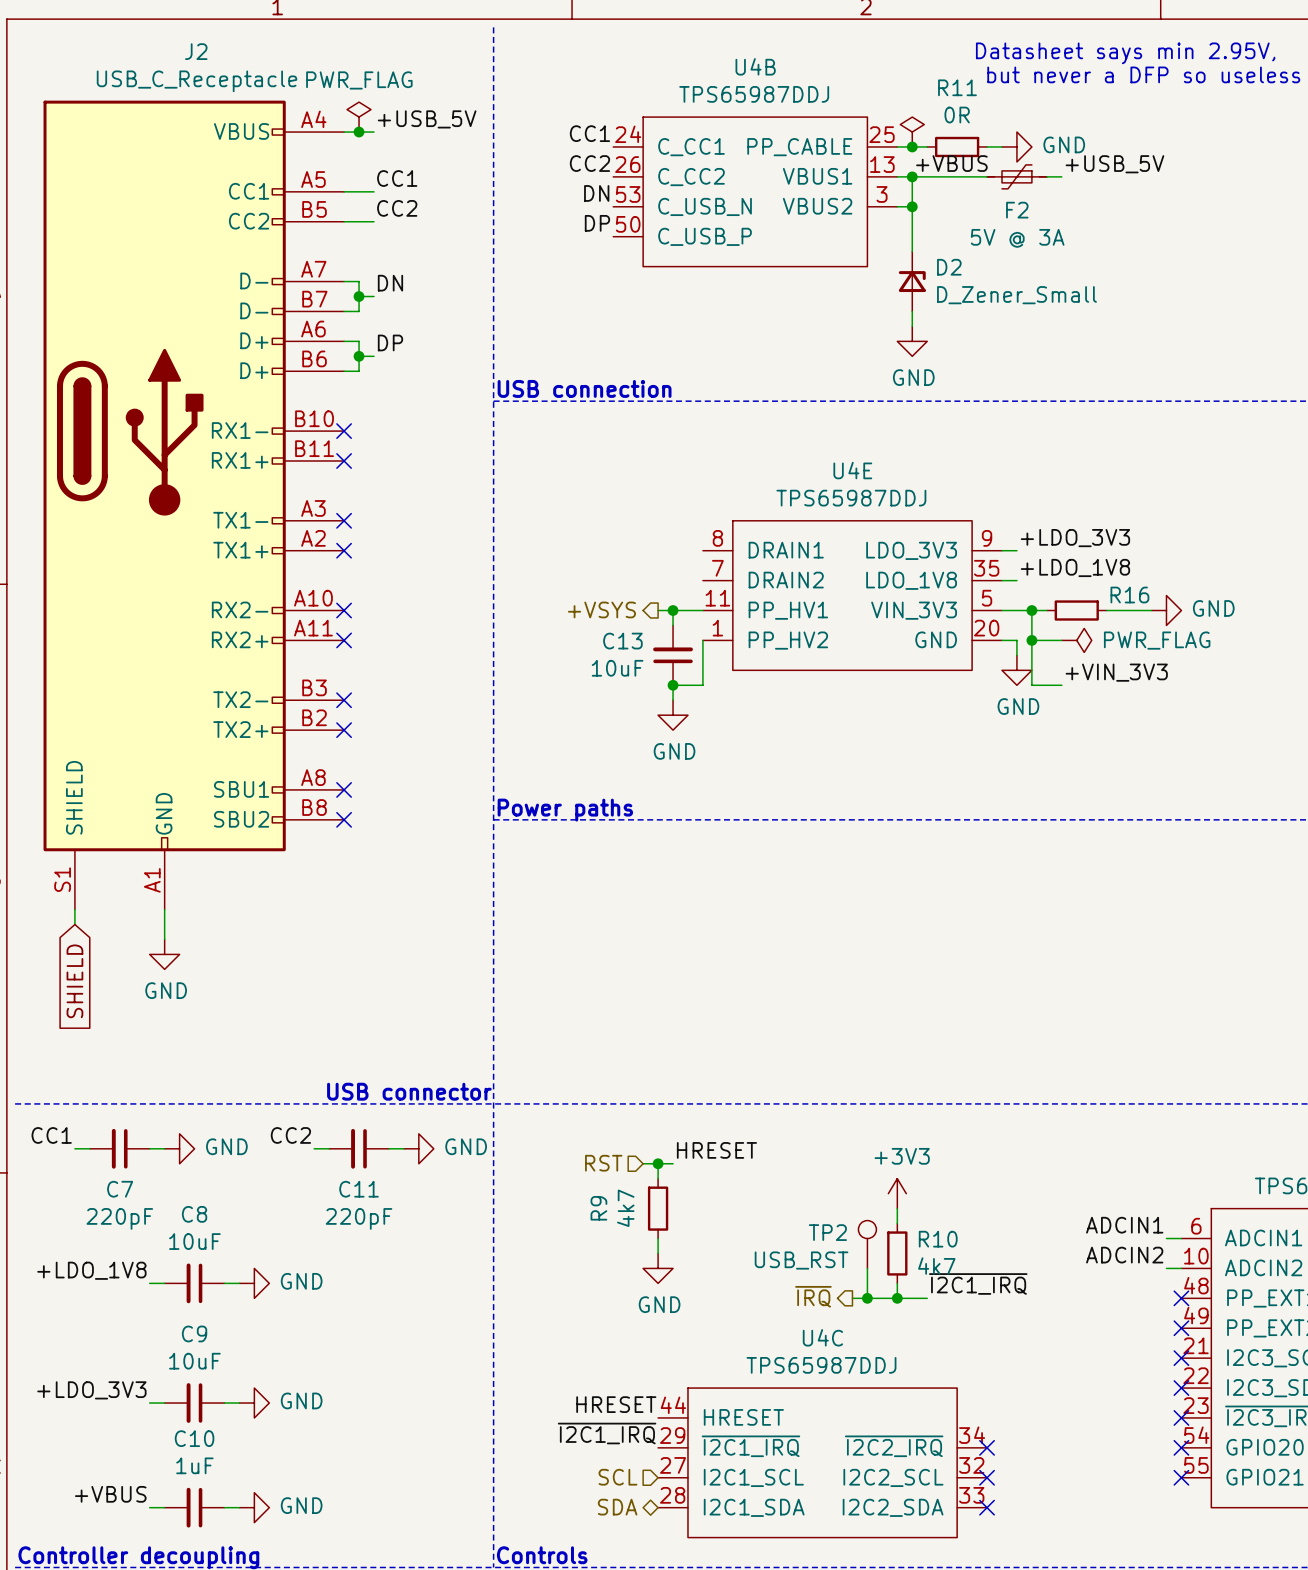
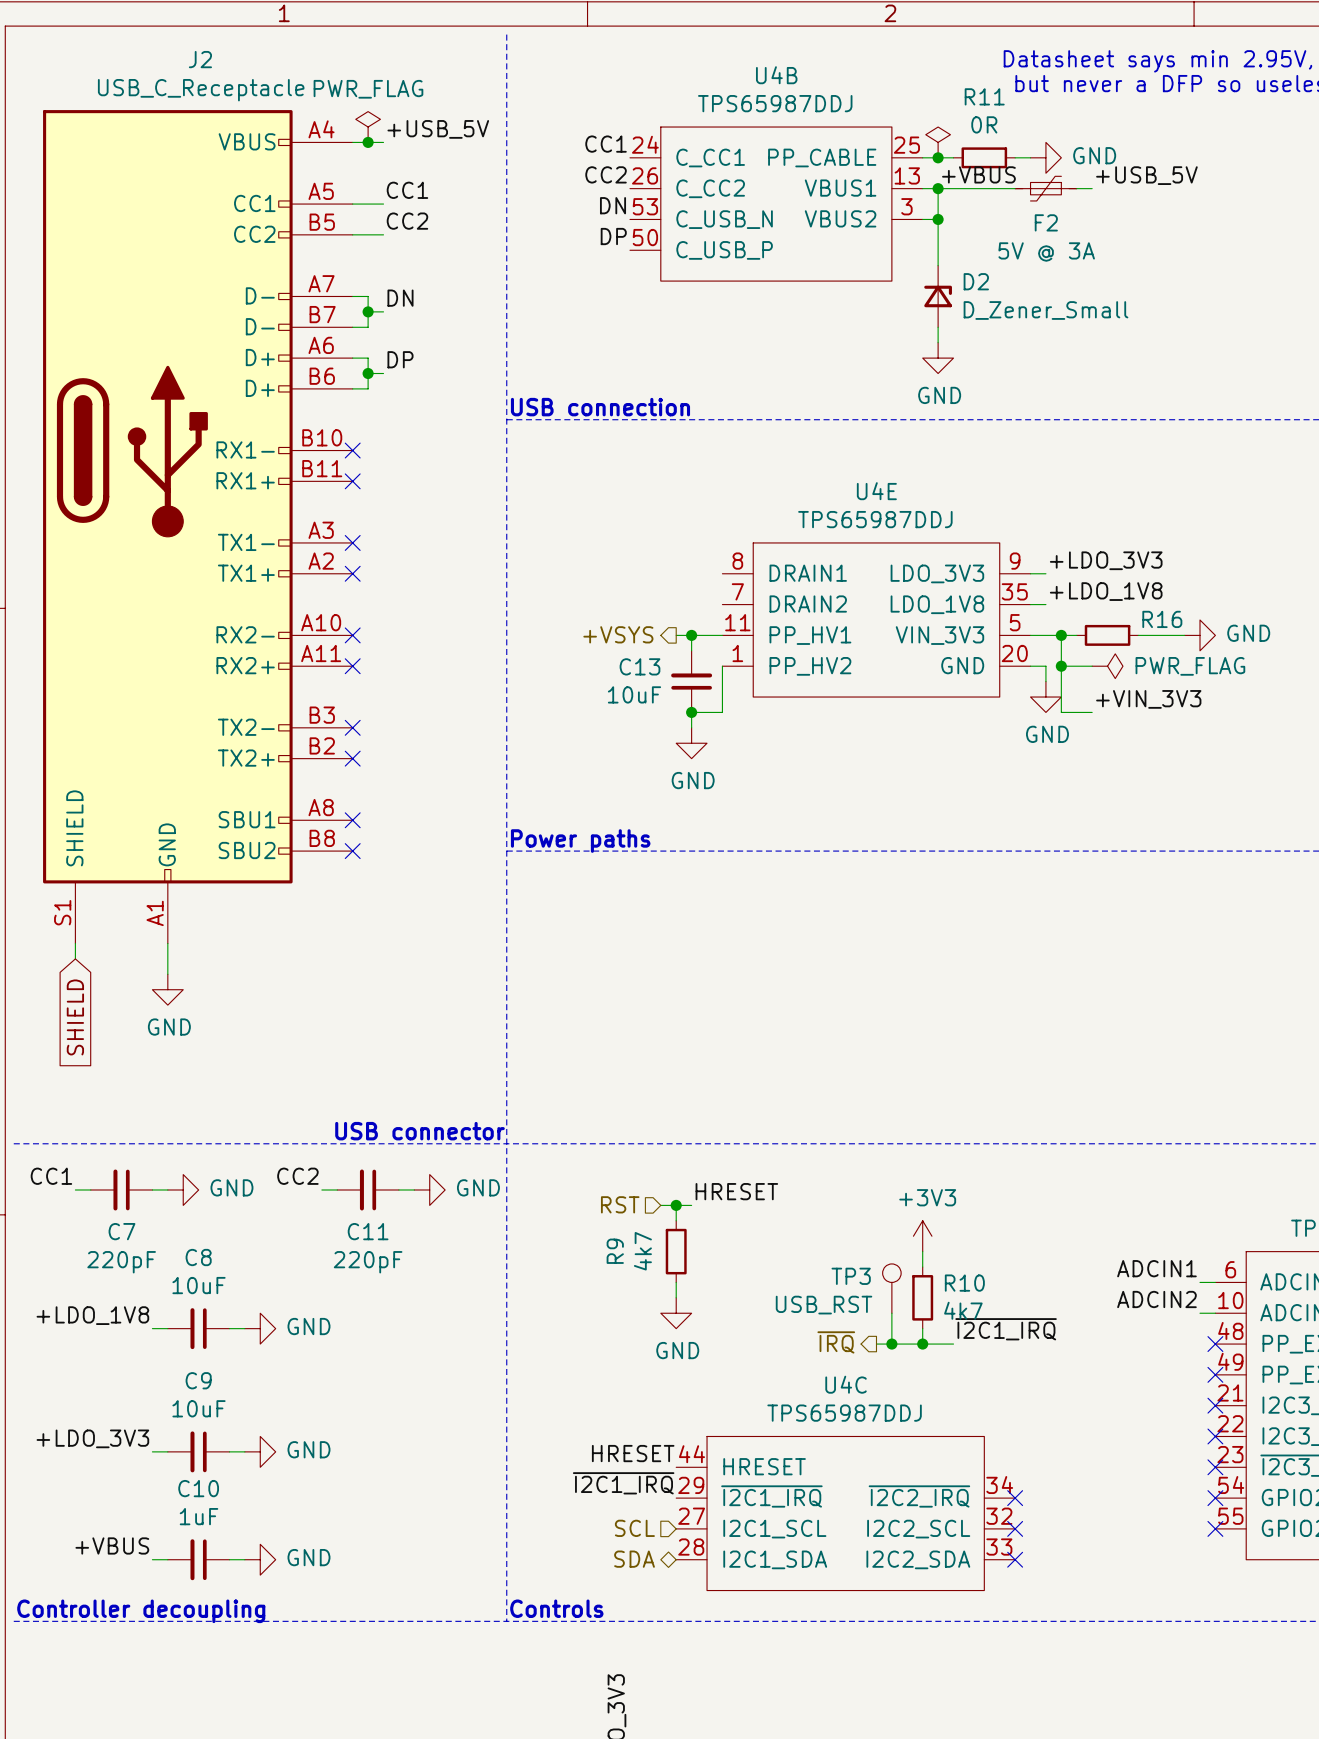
TP2 name: TP2 (827, 1232) -> TP3 (851, 1276)

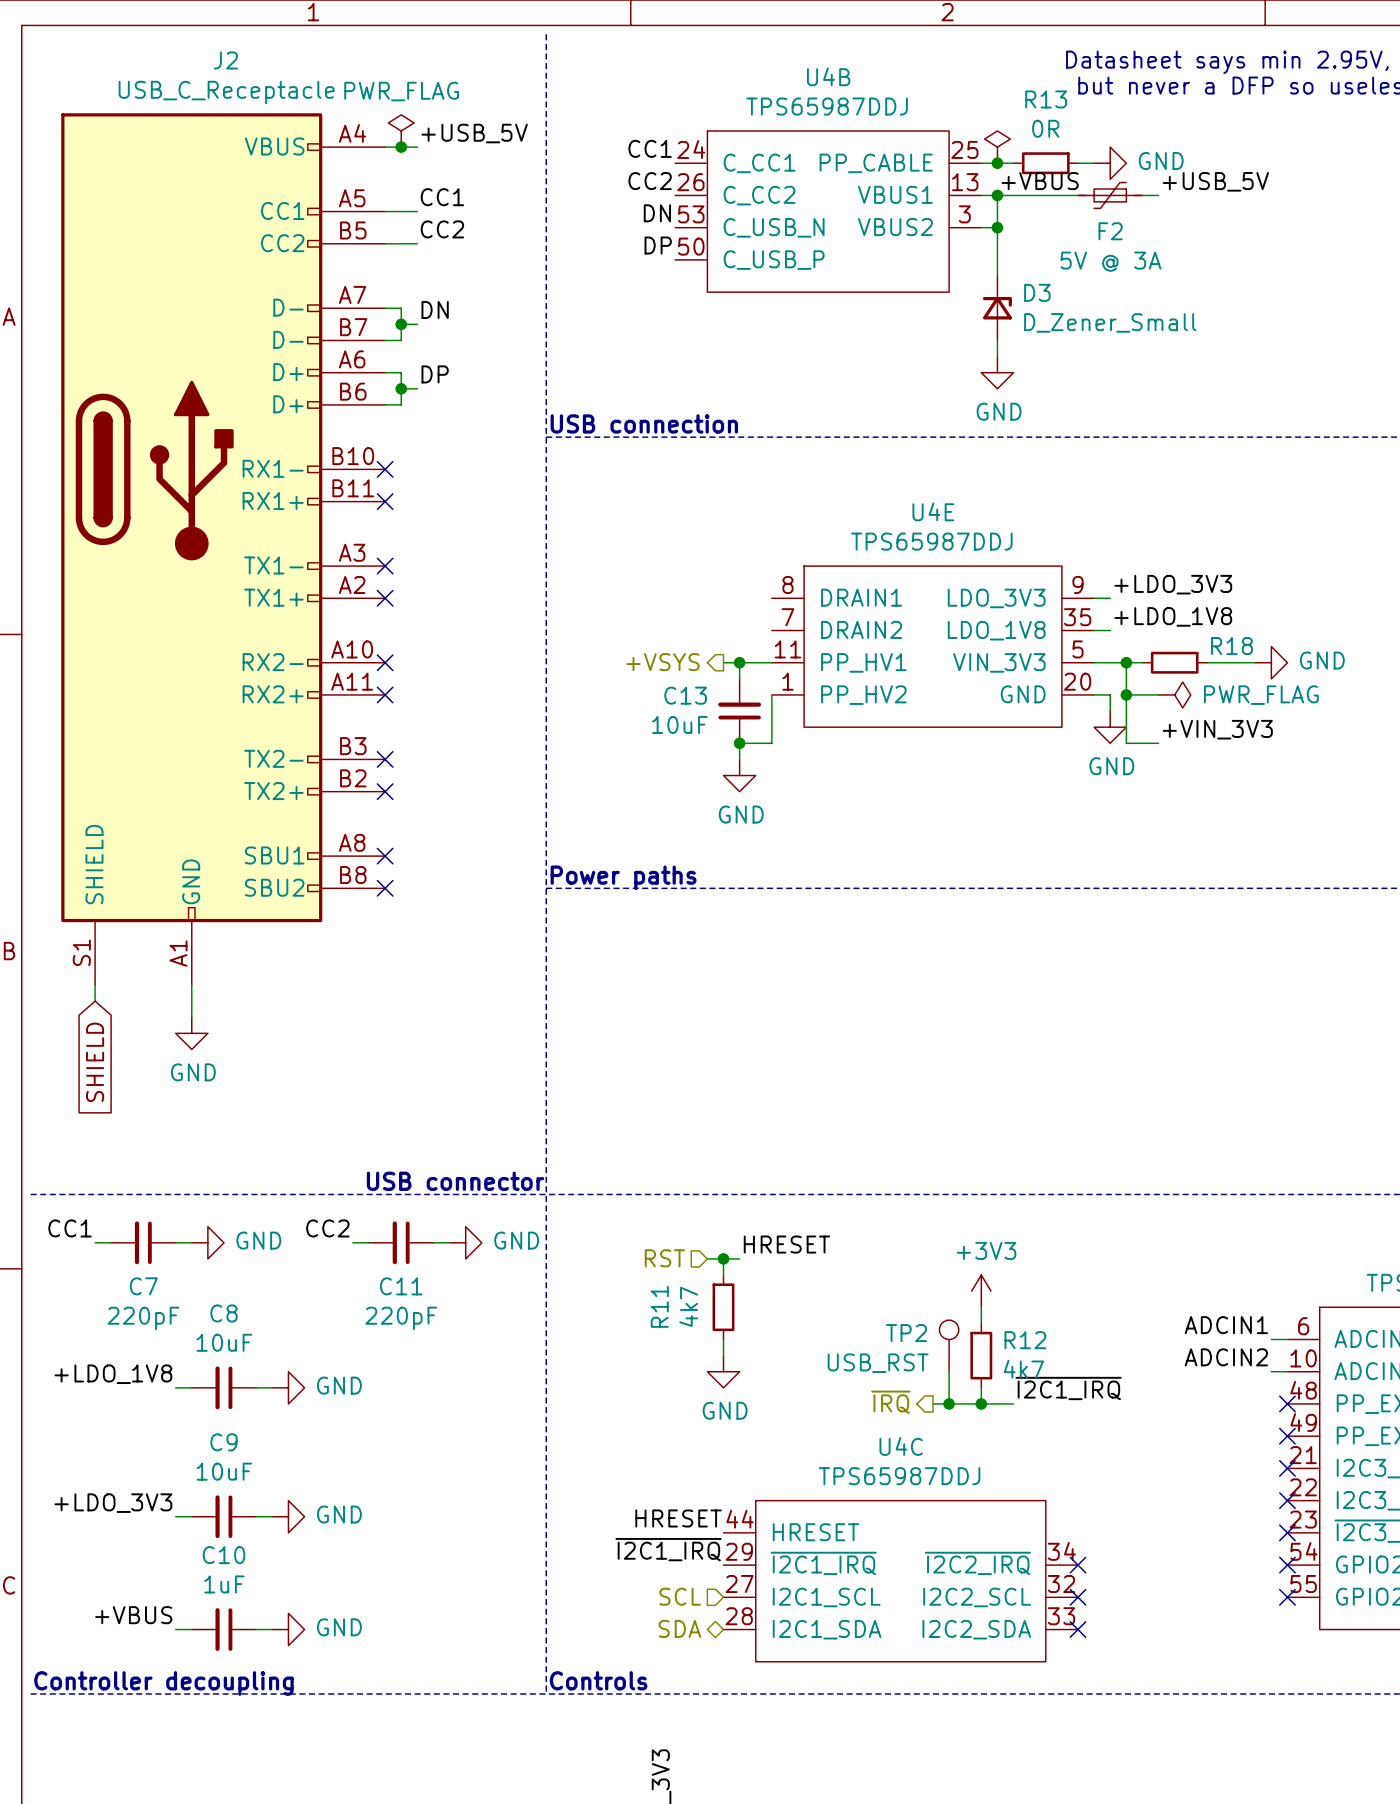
R11 name: R11 (984, 96) -> R13 (1046, 99)
D2 name: D2 (976, 281) -> D3 (1037, 292)
R16 name: R16 (1162, 619) -> R18 (1231, 646)
R9 name: R9 (615, 1251) -> R11 (659, 1306)
TP3 name: TP3 (851, 1276) -> TP2 (906, 1333)
R10 name: R10 (964, 1283) -> R12 (1025, 1340)

